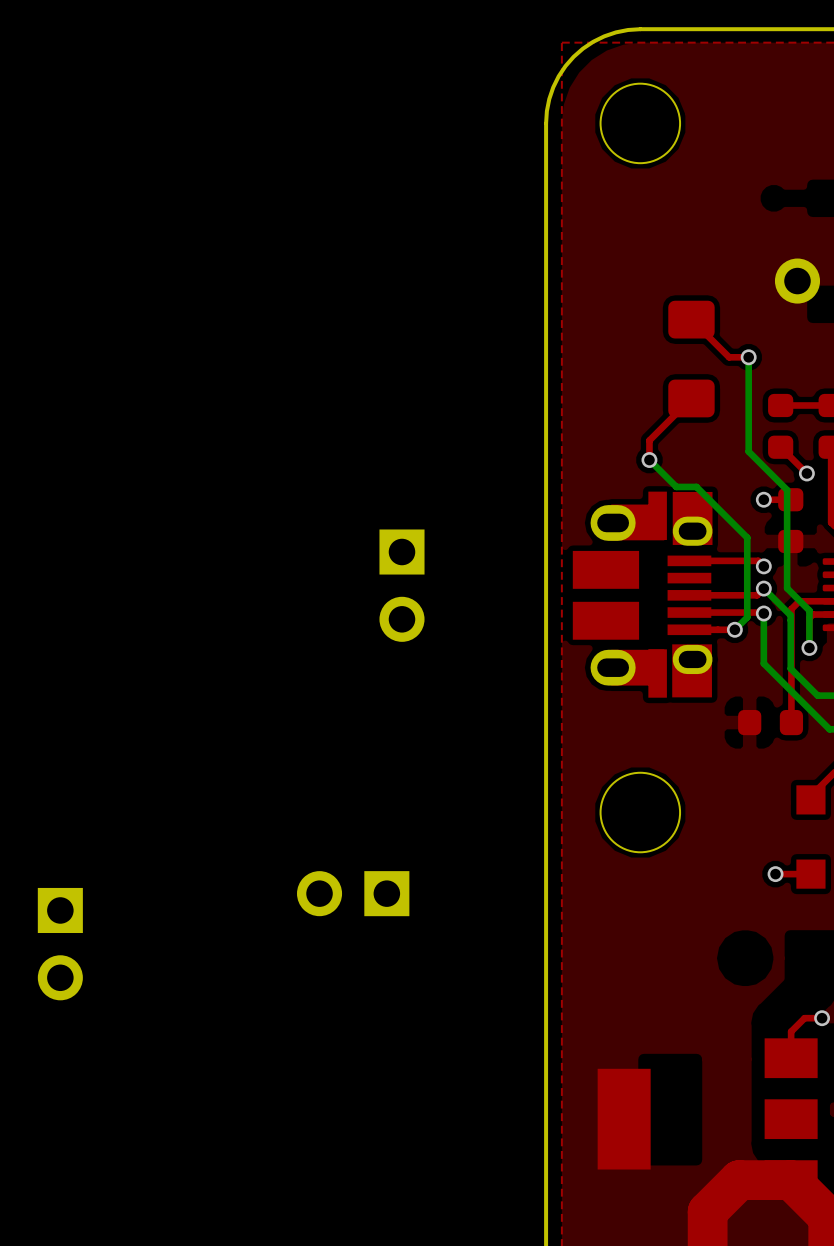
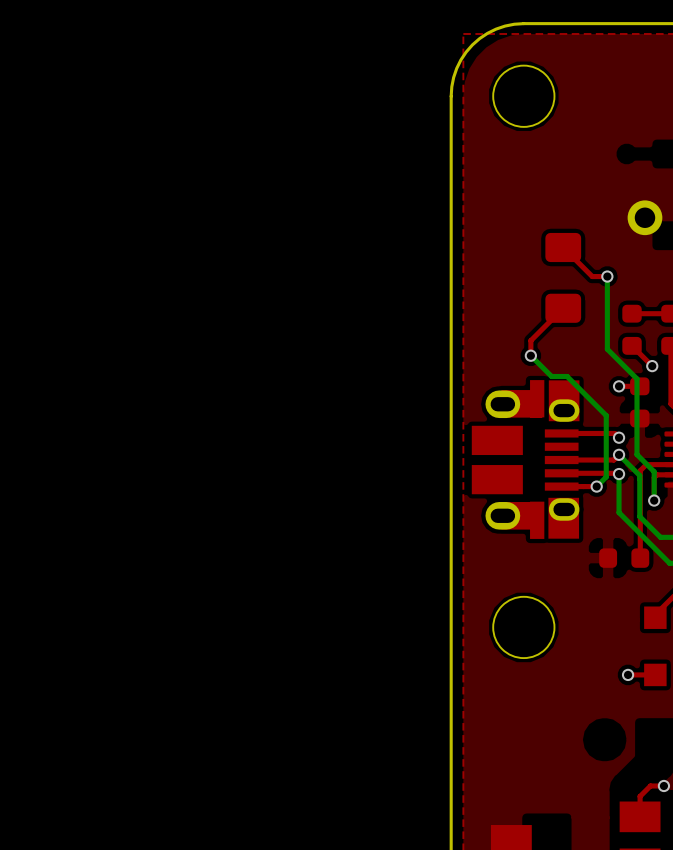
part: (401, 585) -> none
part: (353, 893) -> none
part: (60, 944) -> none

